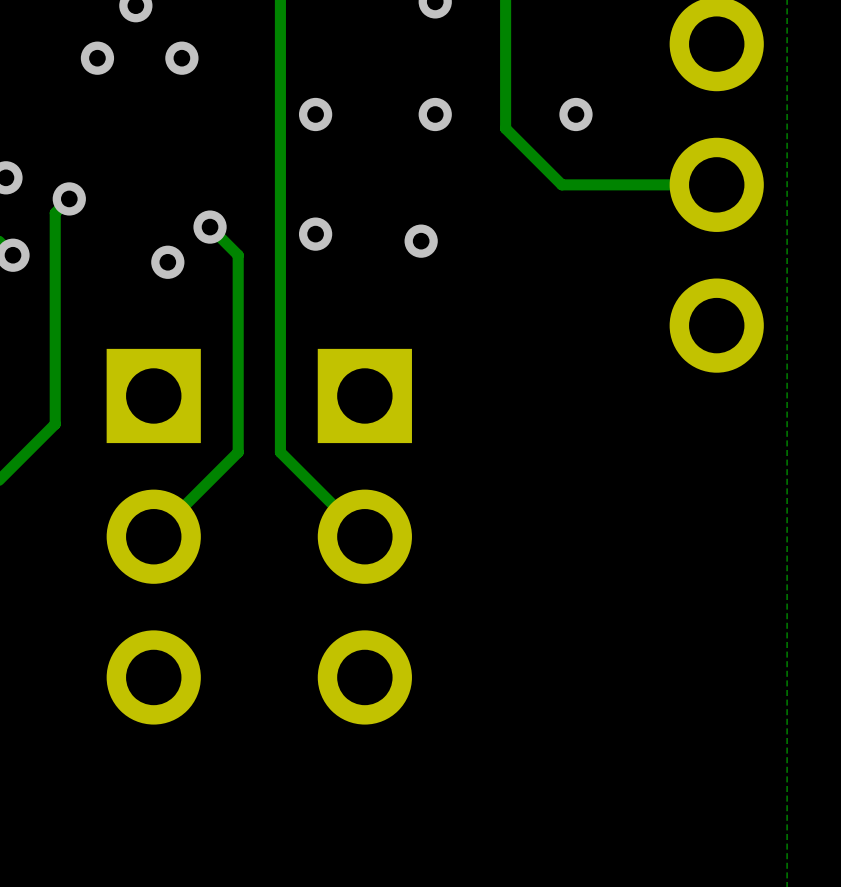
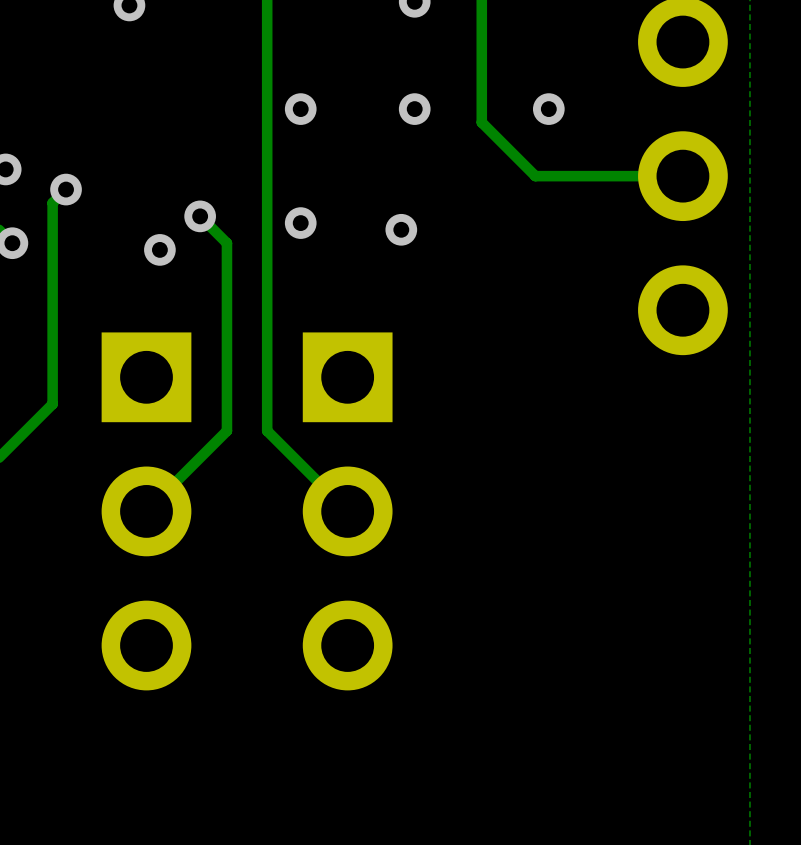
via: (97, 58) -> none
via: (181, 58) -> none

